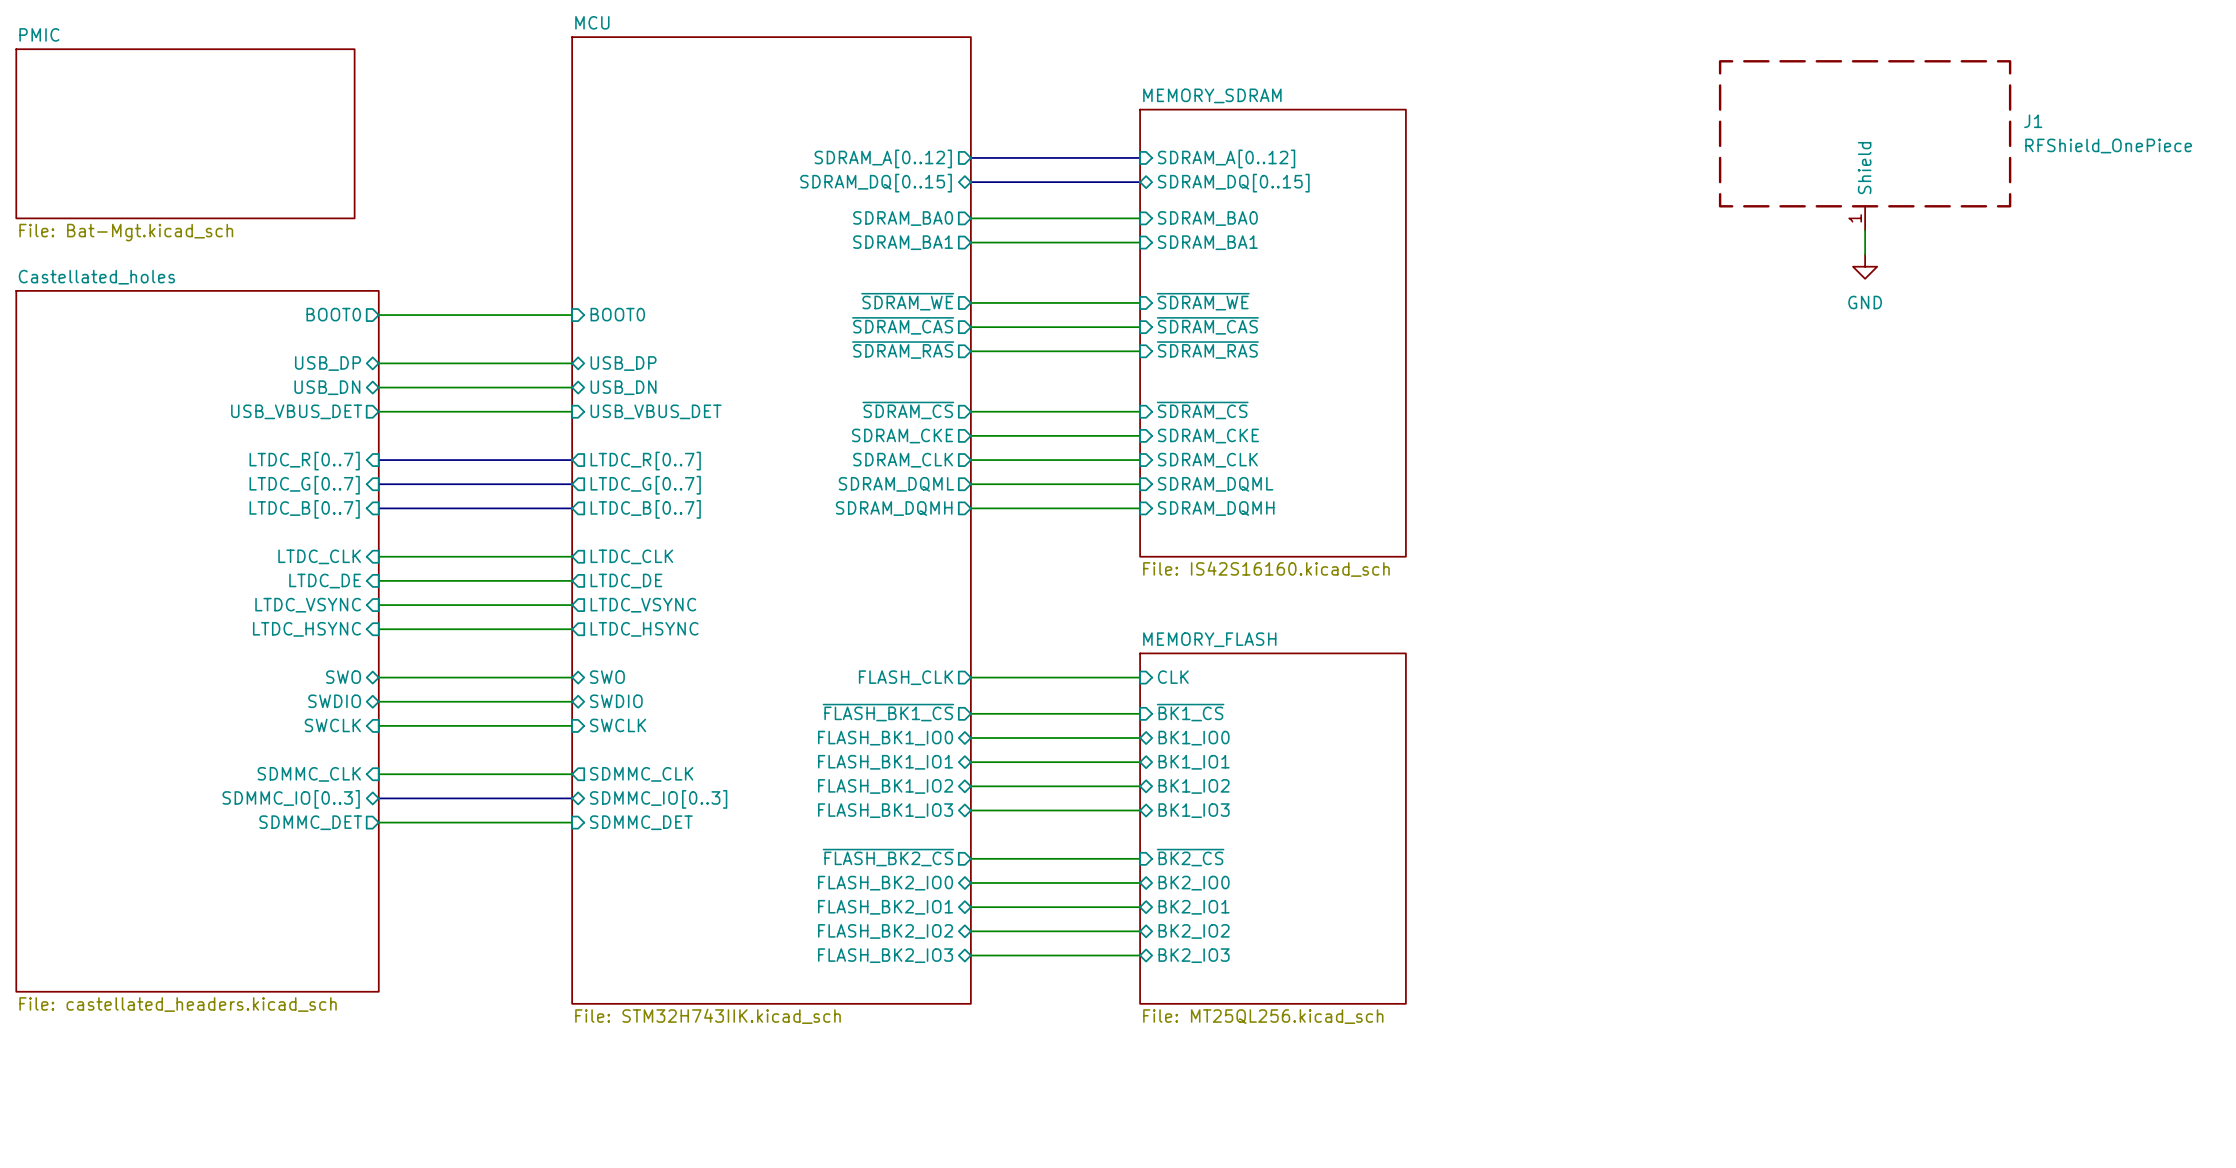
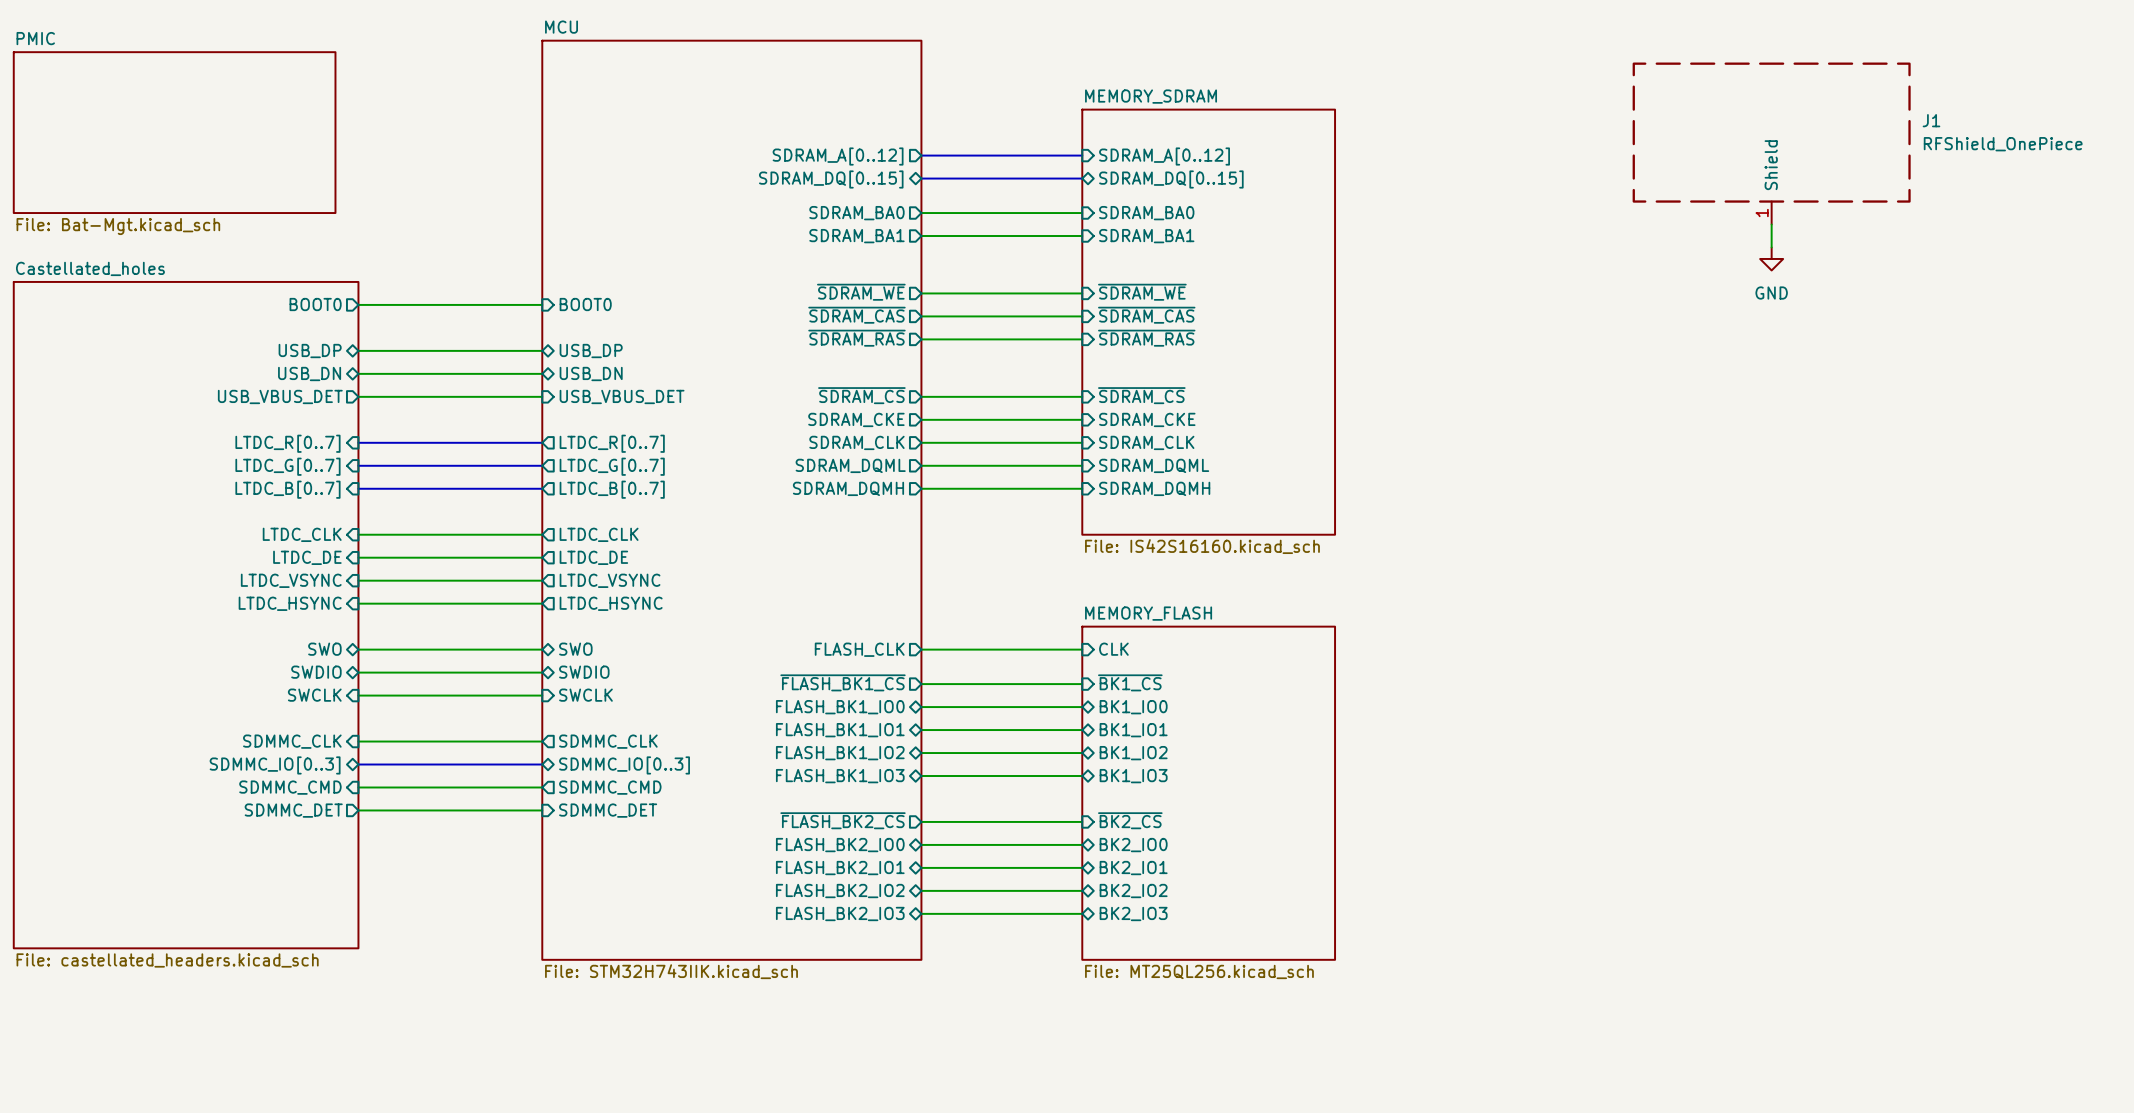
sheet pin shape: output (310, 822) -> input (290, 787)
sheet pin: SDMMC_DET (310, 822) -> SDMMC_CMD (290, 787)
sheet pin shape: input (641, 822) -> output (610, 787)
sheet pin: SDMMC_DET (641, 822) -> SDMMC_CMD (610, 787)
sheet pin: none -> SDMMC_DET (293, 810)
wire: none -> (358, 810) (542, 810)
sheet pin: none -> SDMMC_DET (608, 810)

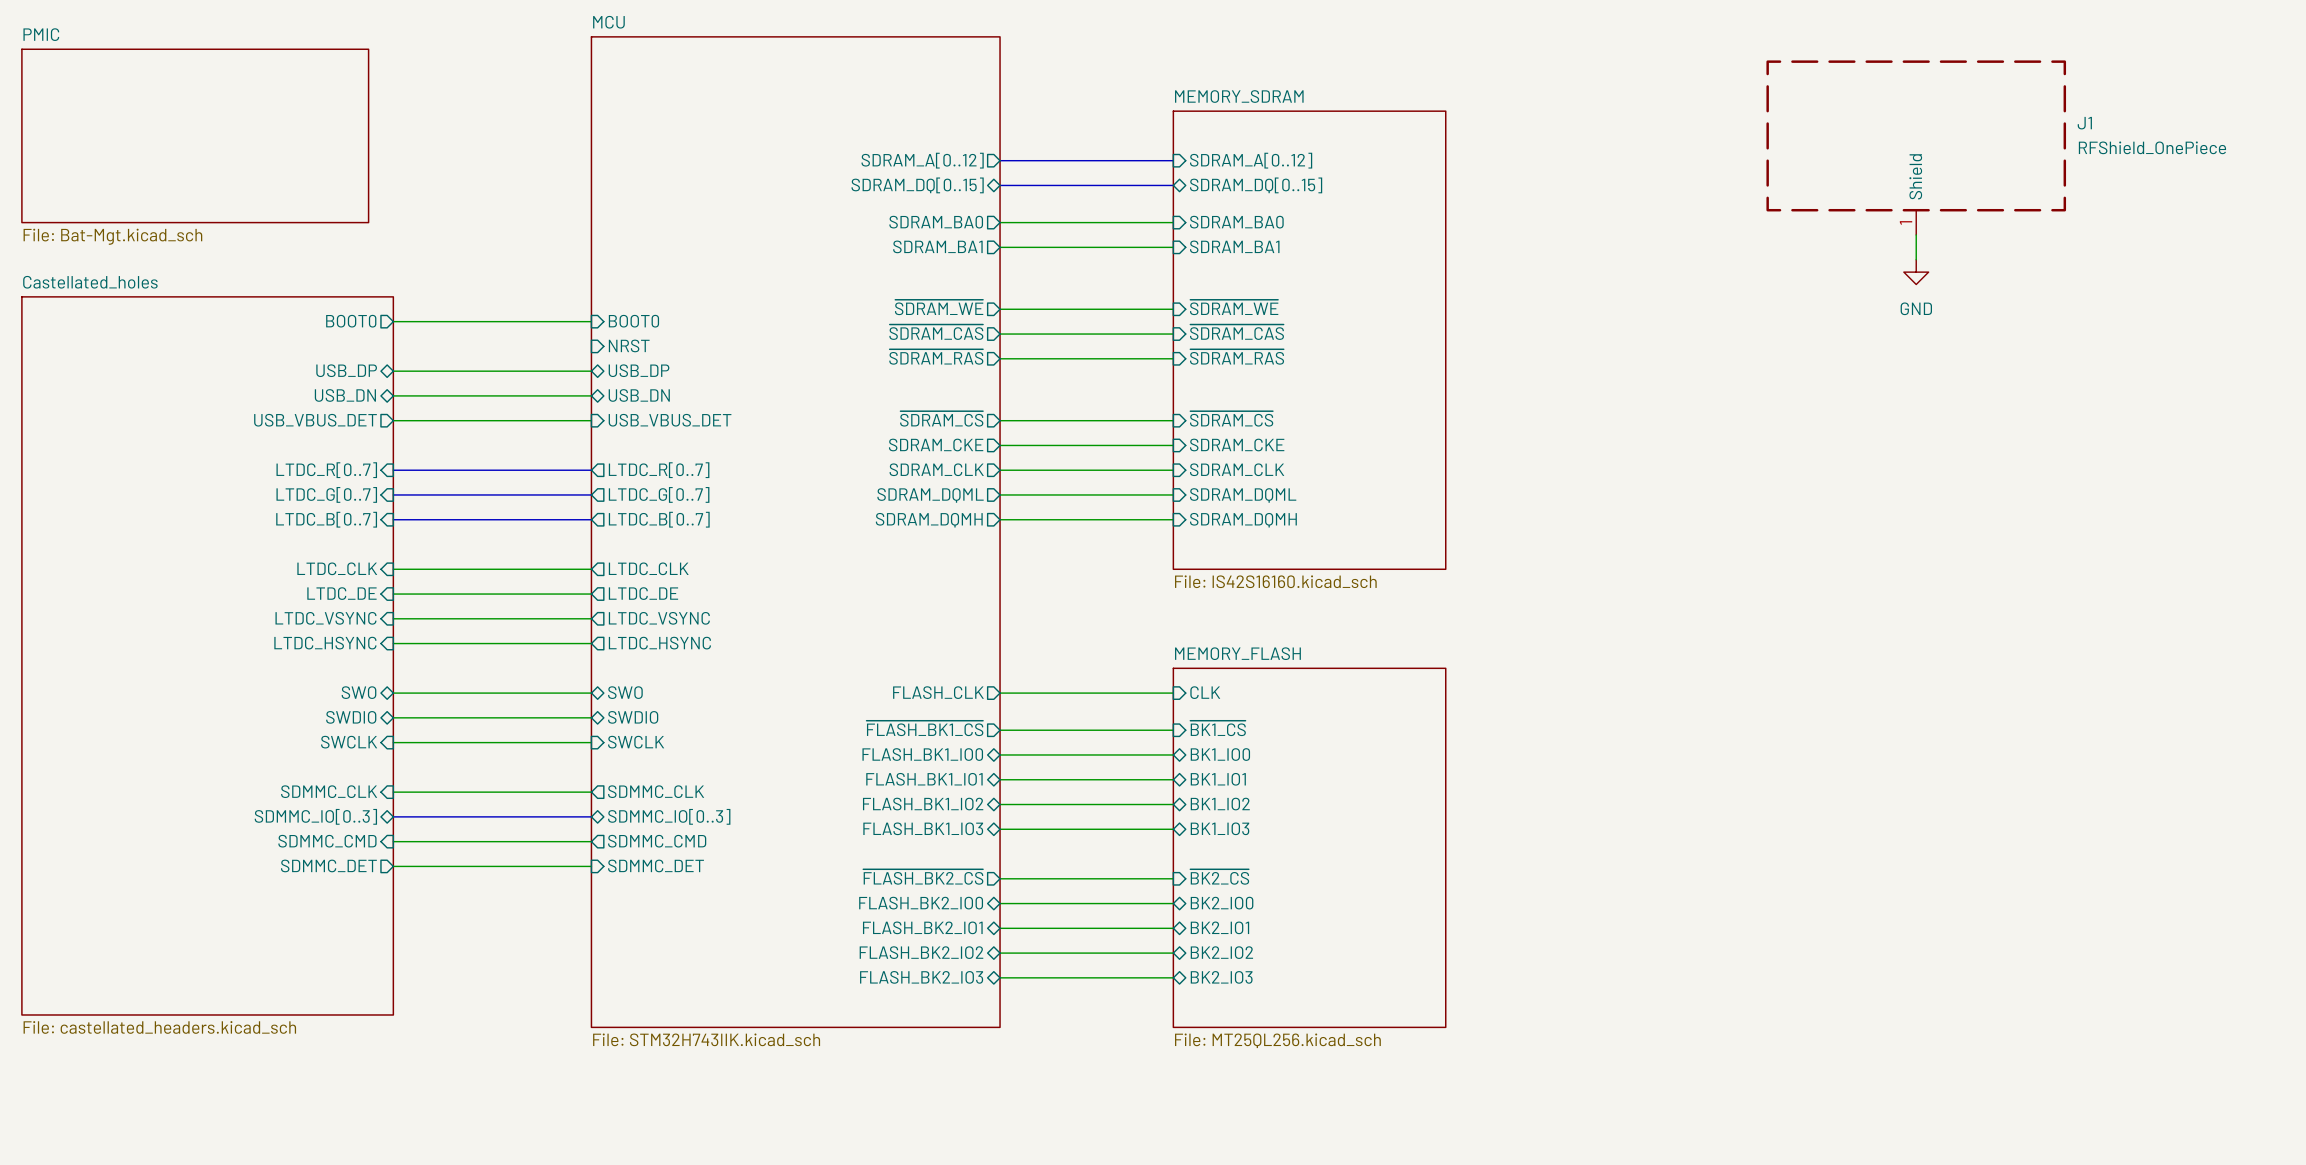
sheet pin: none -> NRST (629, 345)

